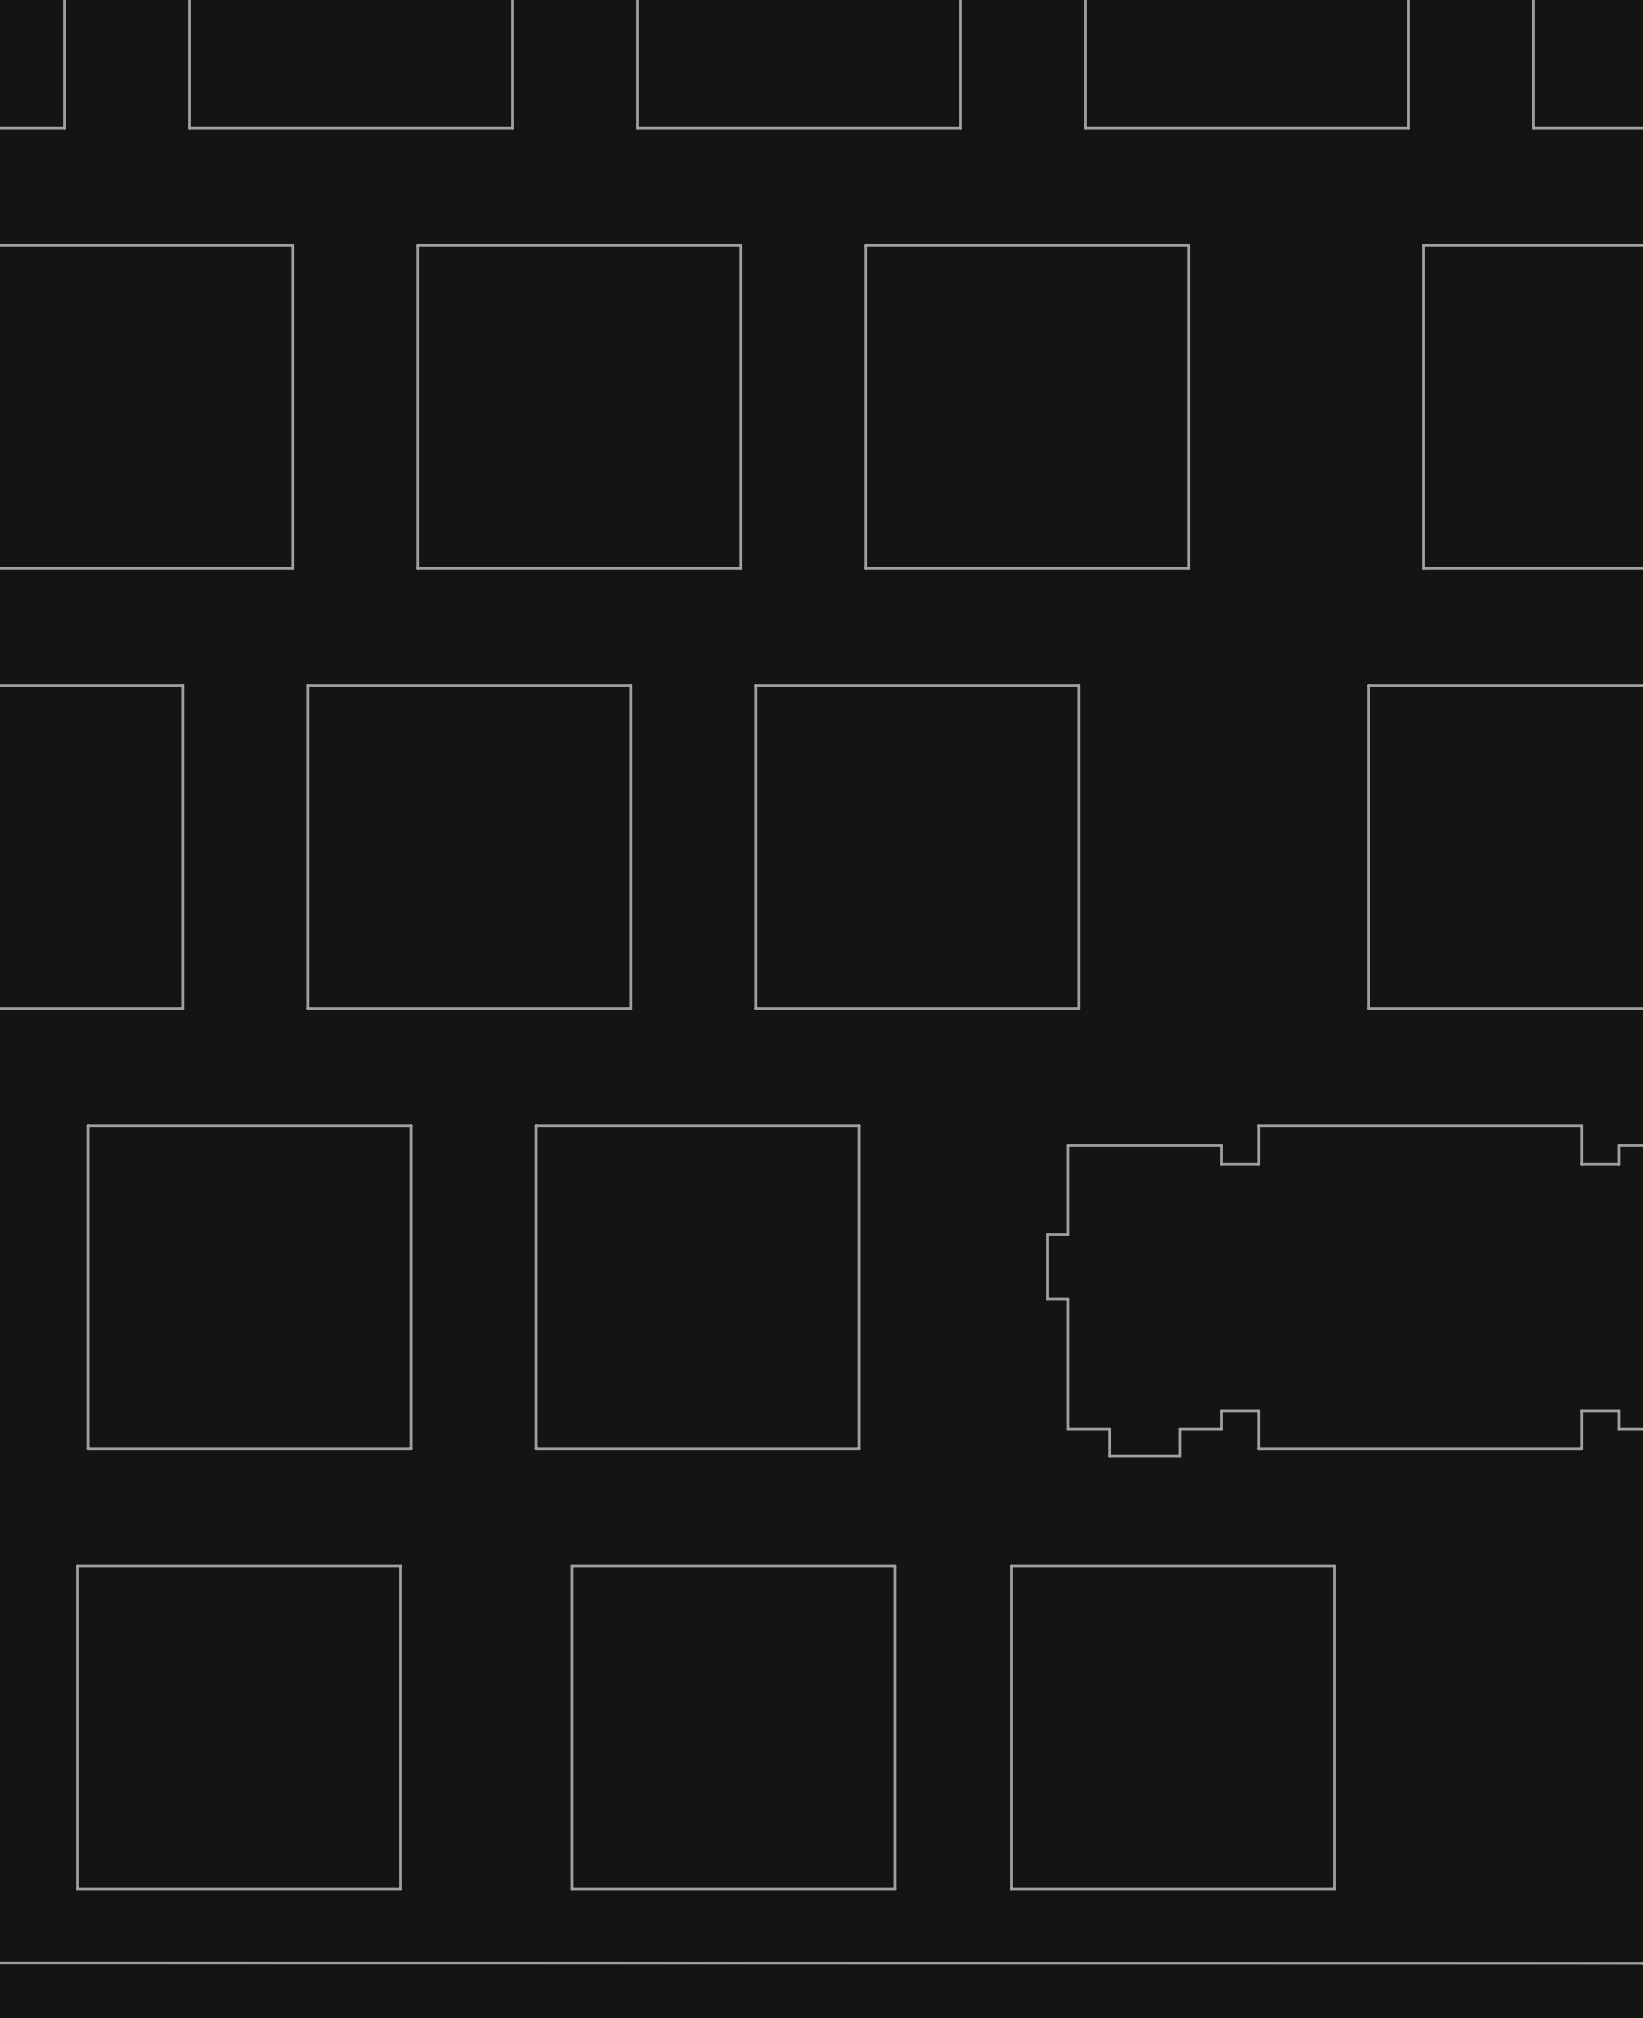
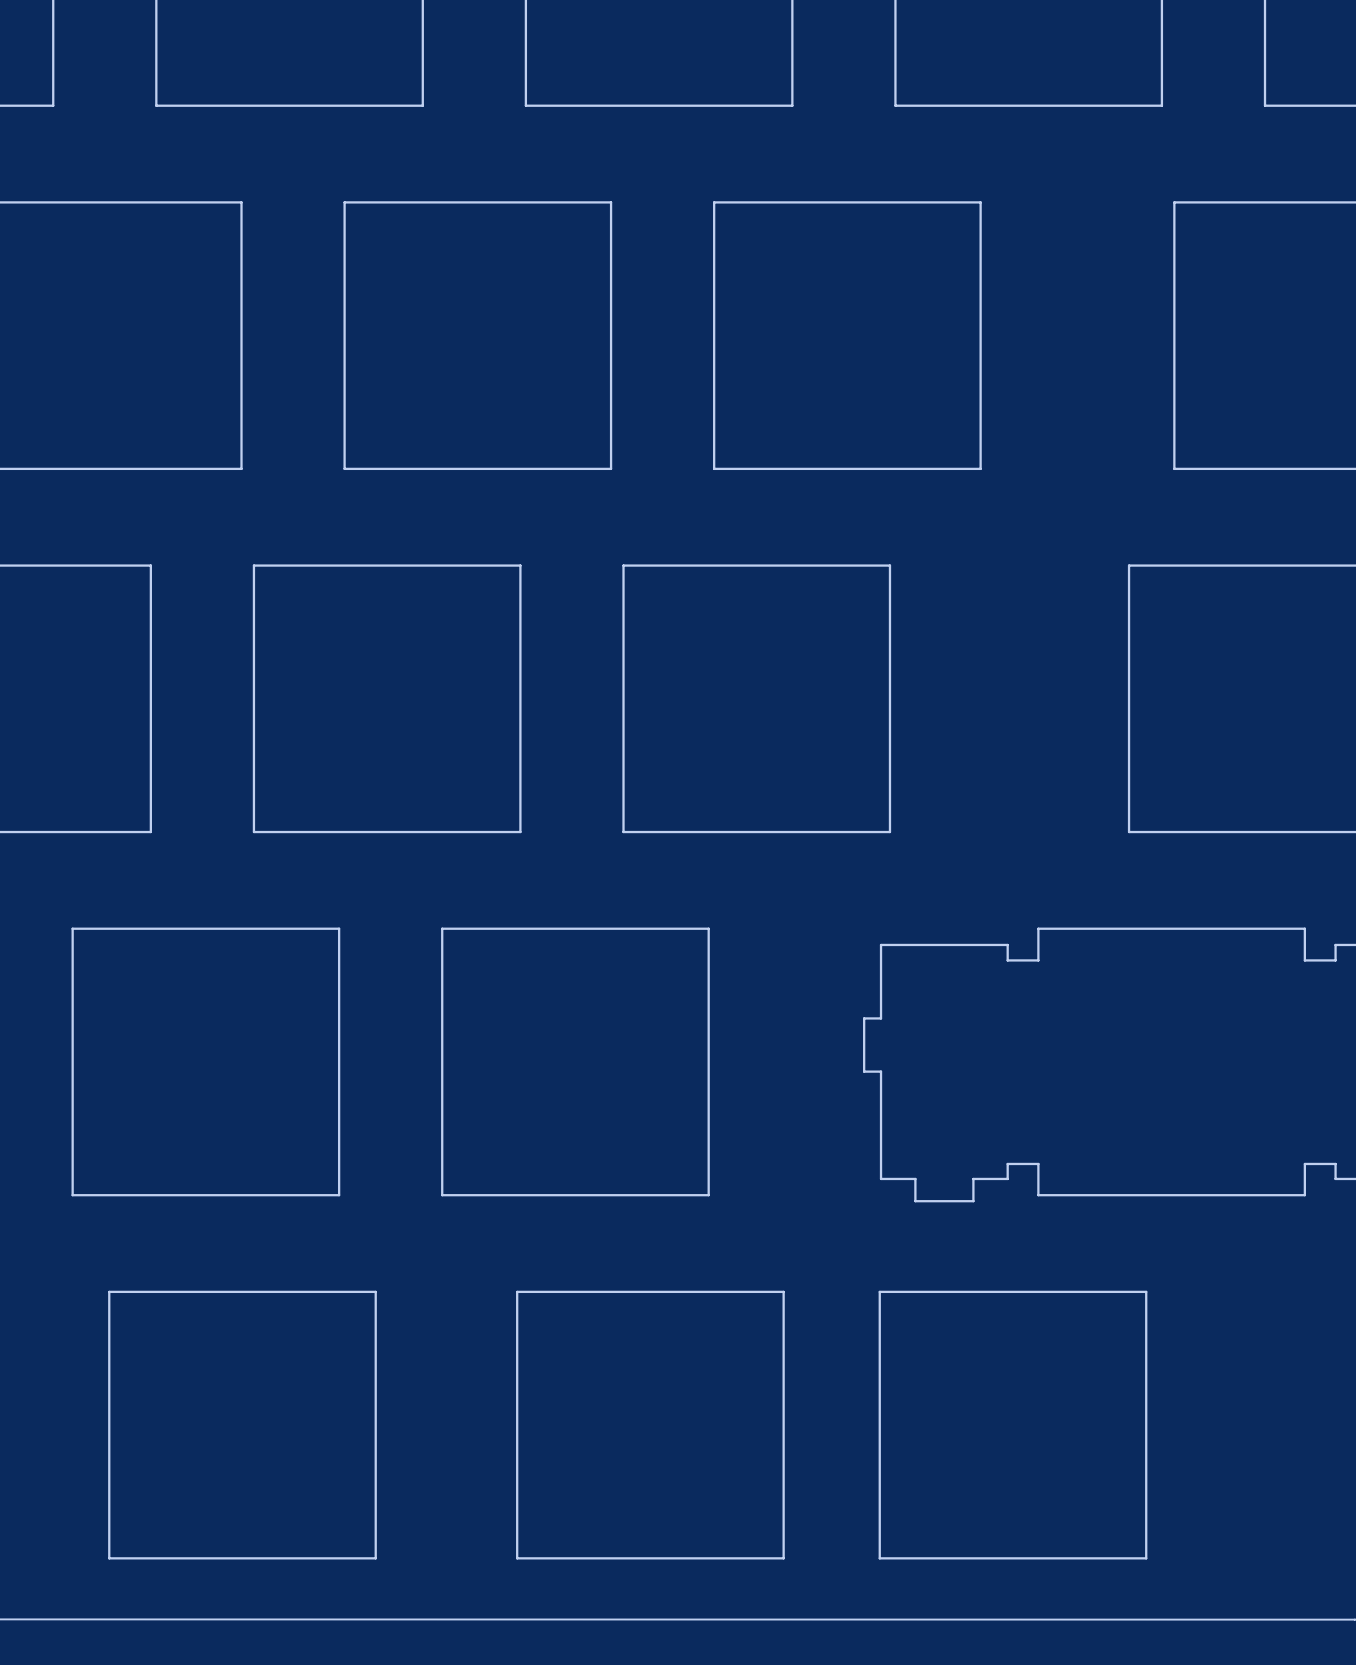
drawing position: (239, 1727) -> (242, 1425)
drawing position: (733, 1727) -> (650, 1425)
drawing position: (1172, 1727) -> (1012, 1425)

